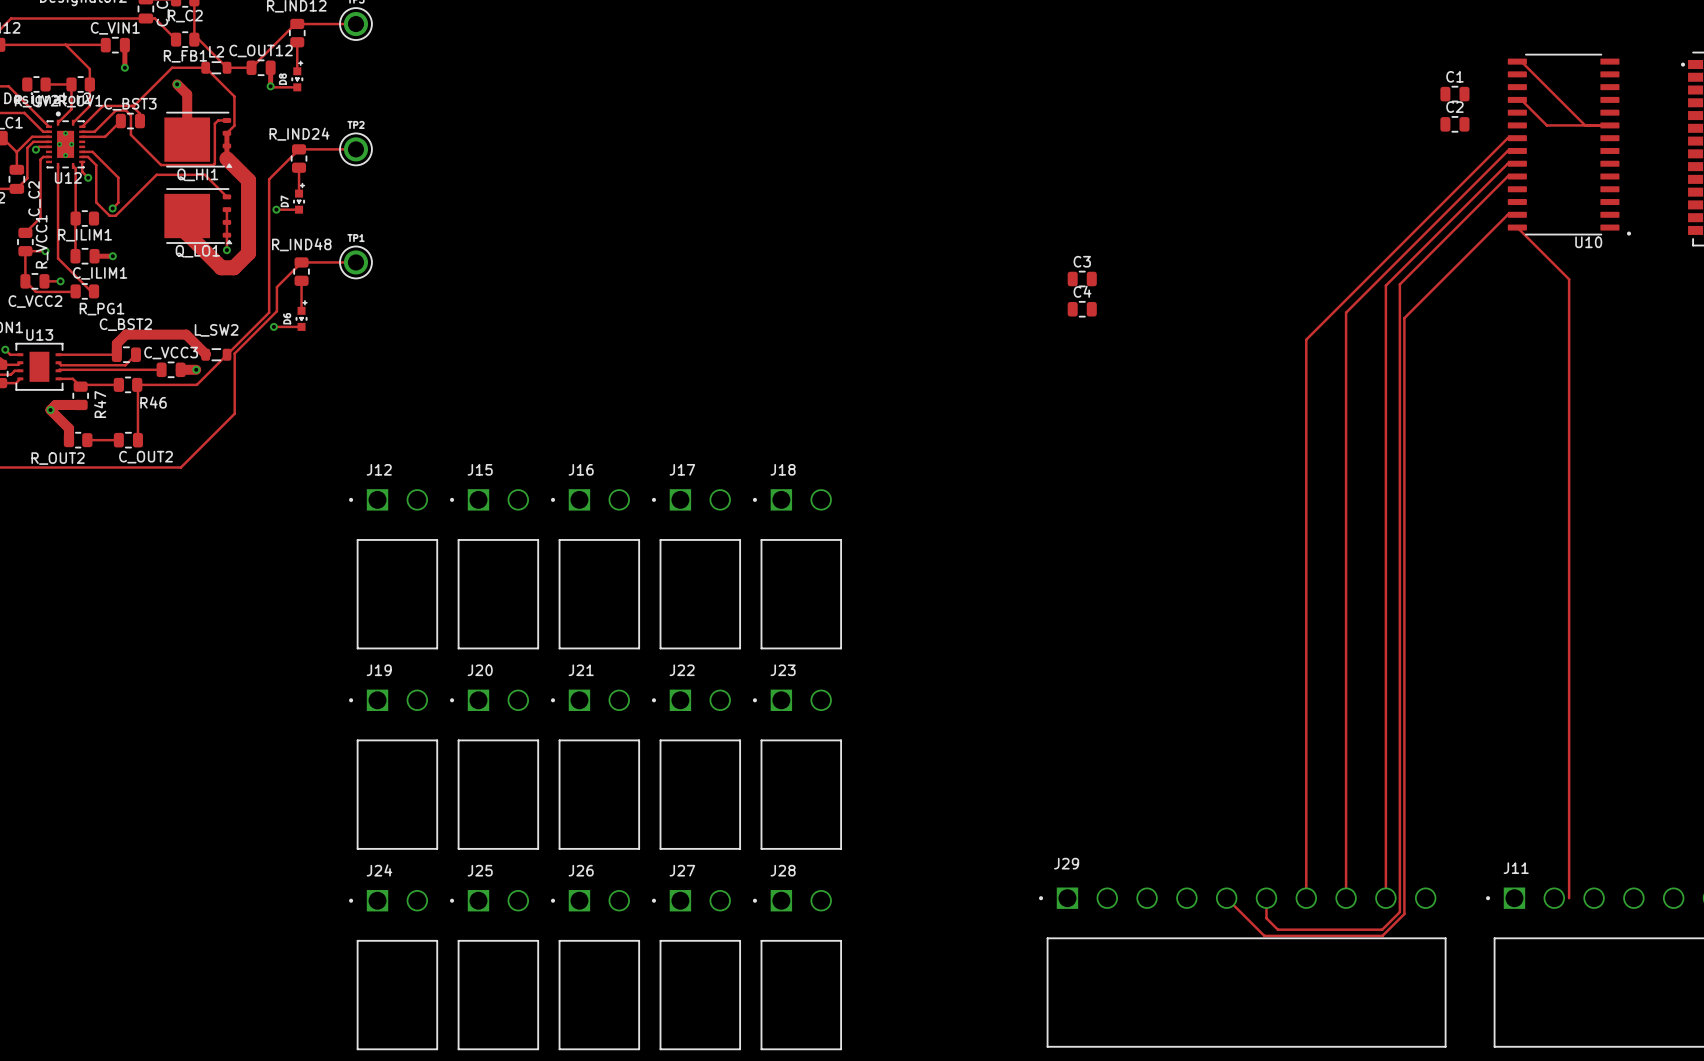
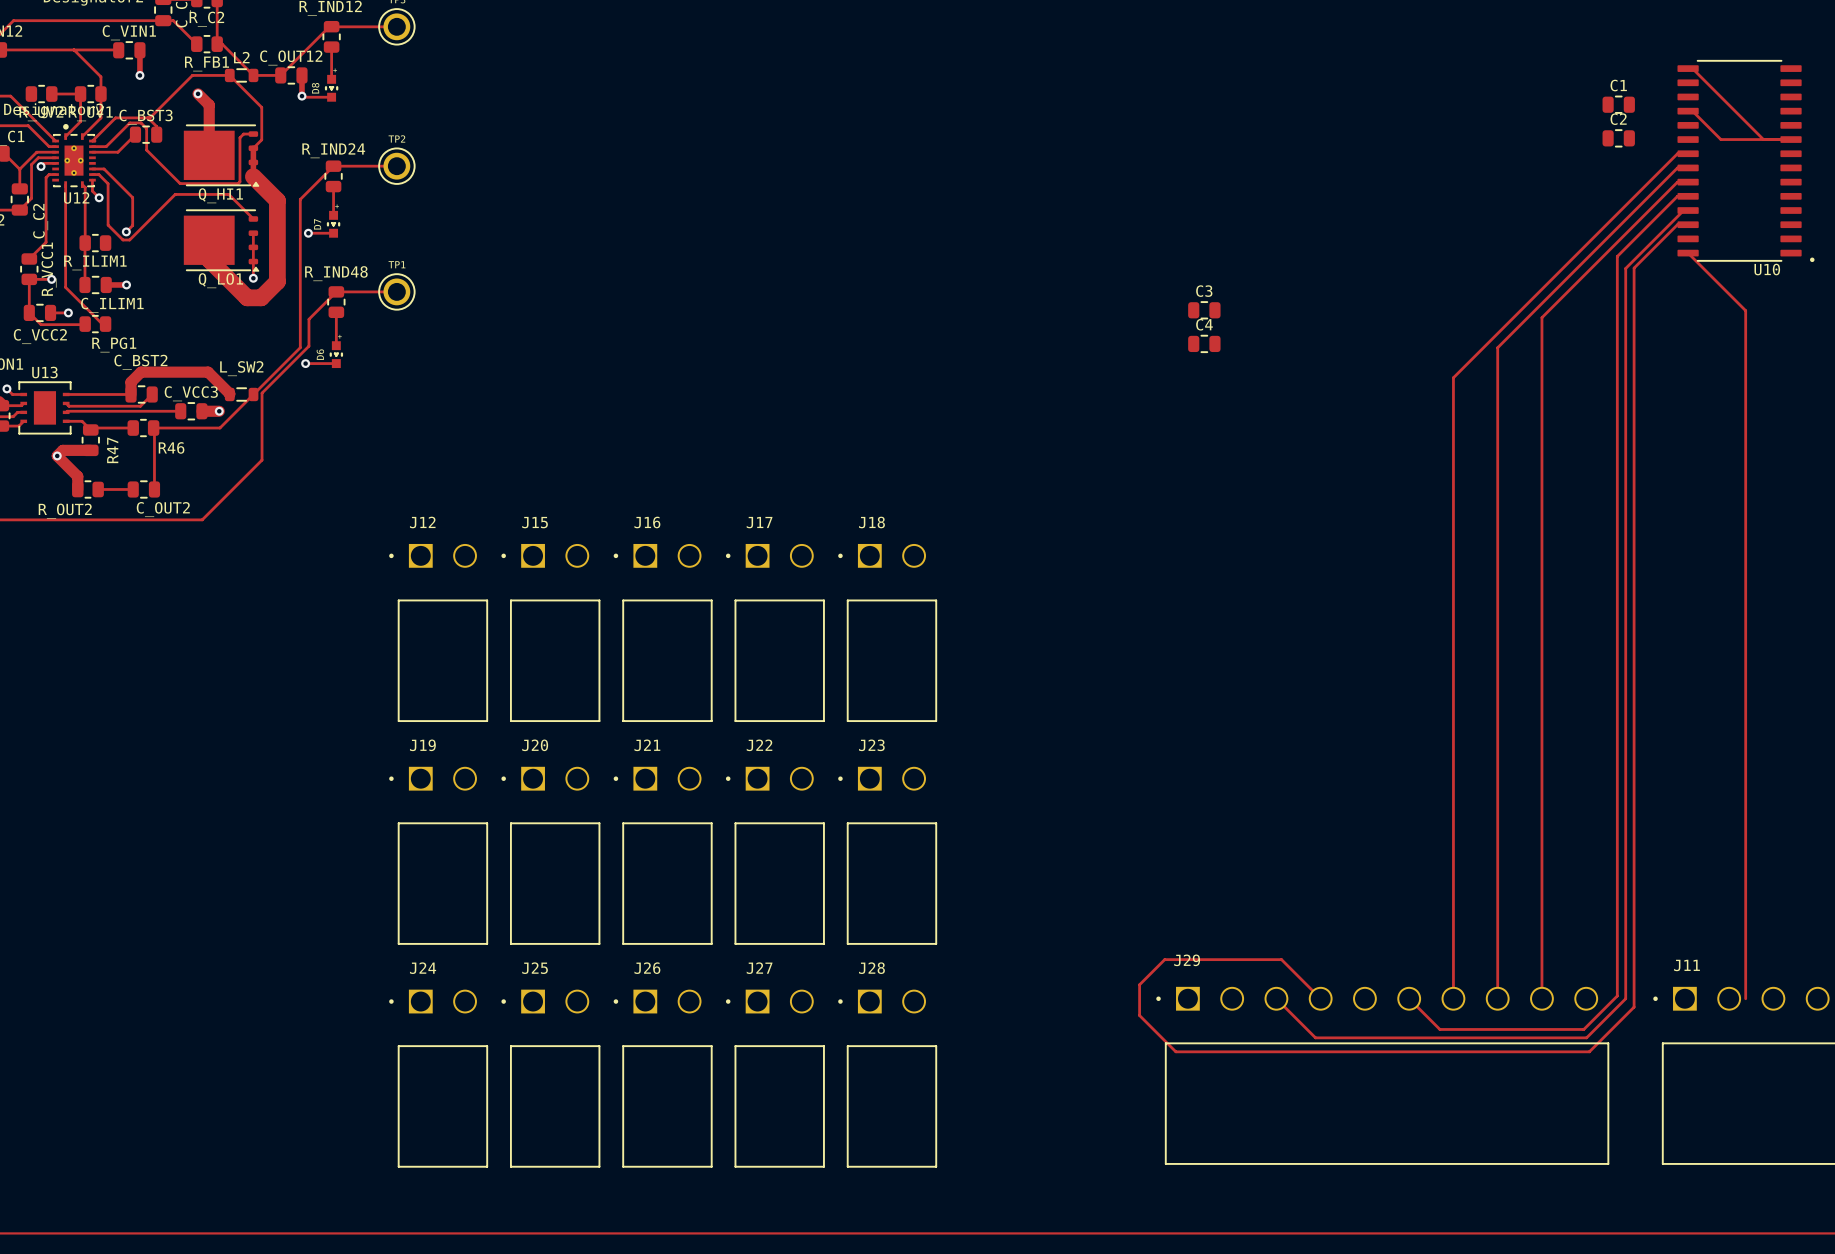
track: none -> (1692, 210) (1683, 210) (1625, 268) (1625, 998) (1586, 1037) (1315, 1037) (1276, 998)
track: none -> (1688, 224) (1677, 224) (1634, 268) (1634, 1007) (1589, 1051) (1175, 1051) (1139, 1015) (1139, 984) (1164, 959) (1281, 959) (1320, 998)
track: (1517, 214) (1507, 214) (1404, 318) (1404, 913) (1382, 935) (1264, 935) (1226, 898) -> none
track: (1453, 230) (1399, 284) (1399, 912) (1382, 929) (1277, 929) (1266, 918) (1266, 898) -> (1617, 256) (1617, 995) (1583, 1029) (1439, 1029) (1409, 998)

